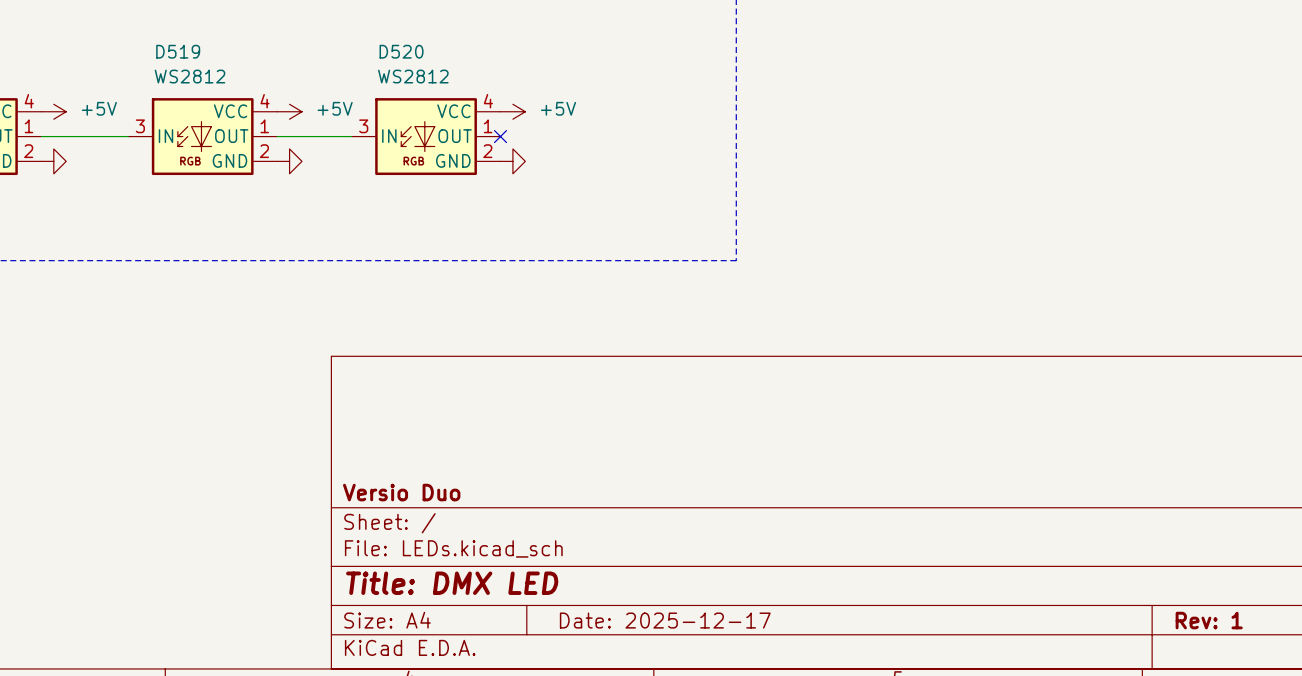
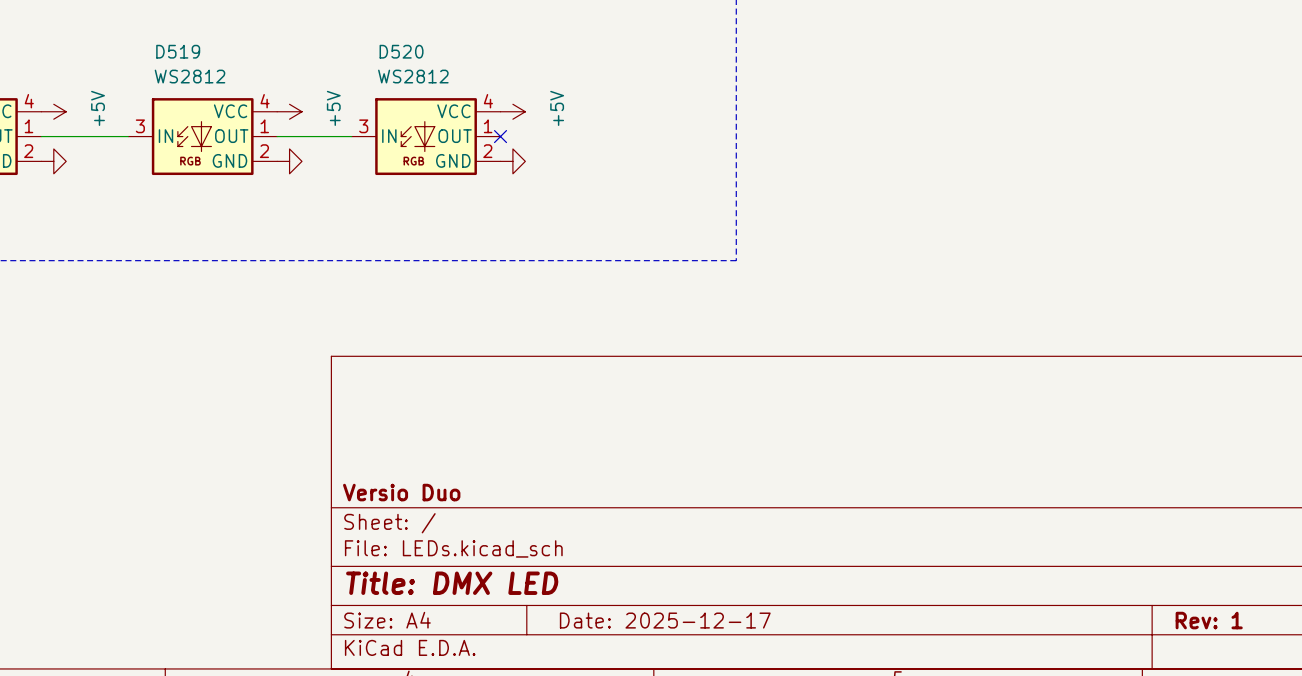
power symbol text rotation: 0° (99, 108) -> 90° counterclockwise (98, 108)
power symbol text rotation: 0° (335, 108) -> 90° counterclockwise (333, 108)
power symbol text rotation: 0° (558, 108) -> 90° counterclockwise (557, 108)

